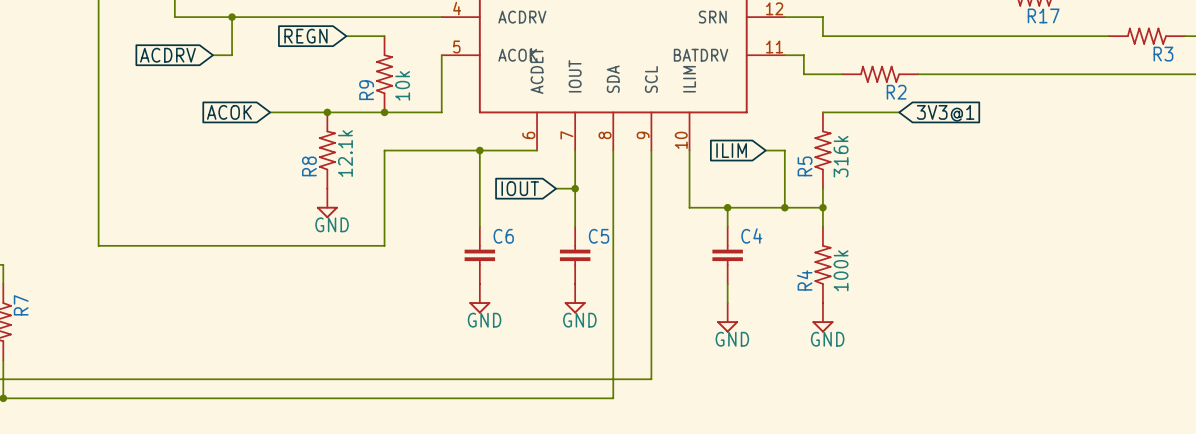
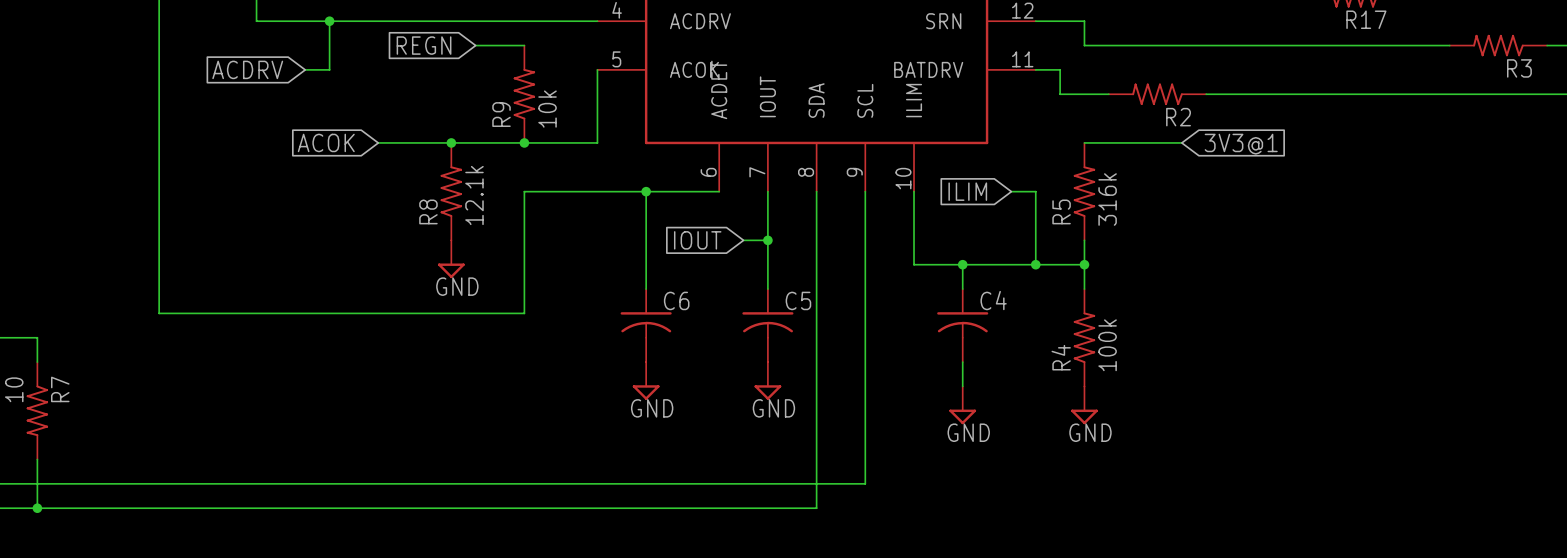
C6 symbol: [464, 226, 496, 284] -> [620, 289, 672, 363]
C5 symbol: [559, 226, 591, 284] -> [742, 289, 794, 363]
C4 symbol: [712, 226, 743, 284] -> [937, 289, 989, 363]

